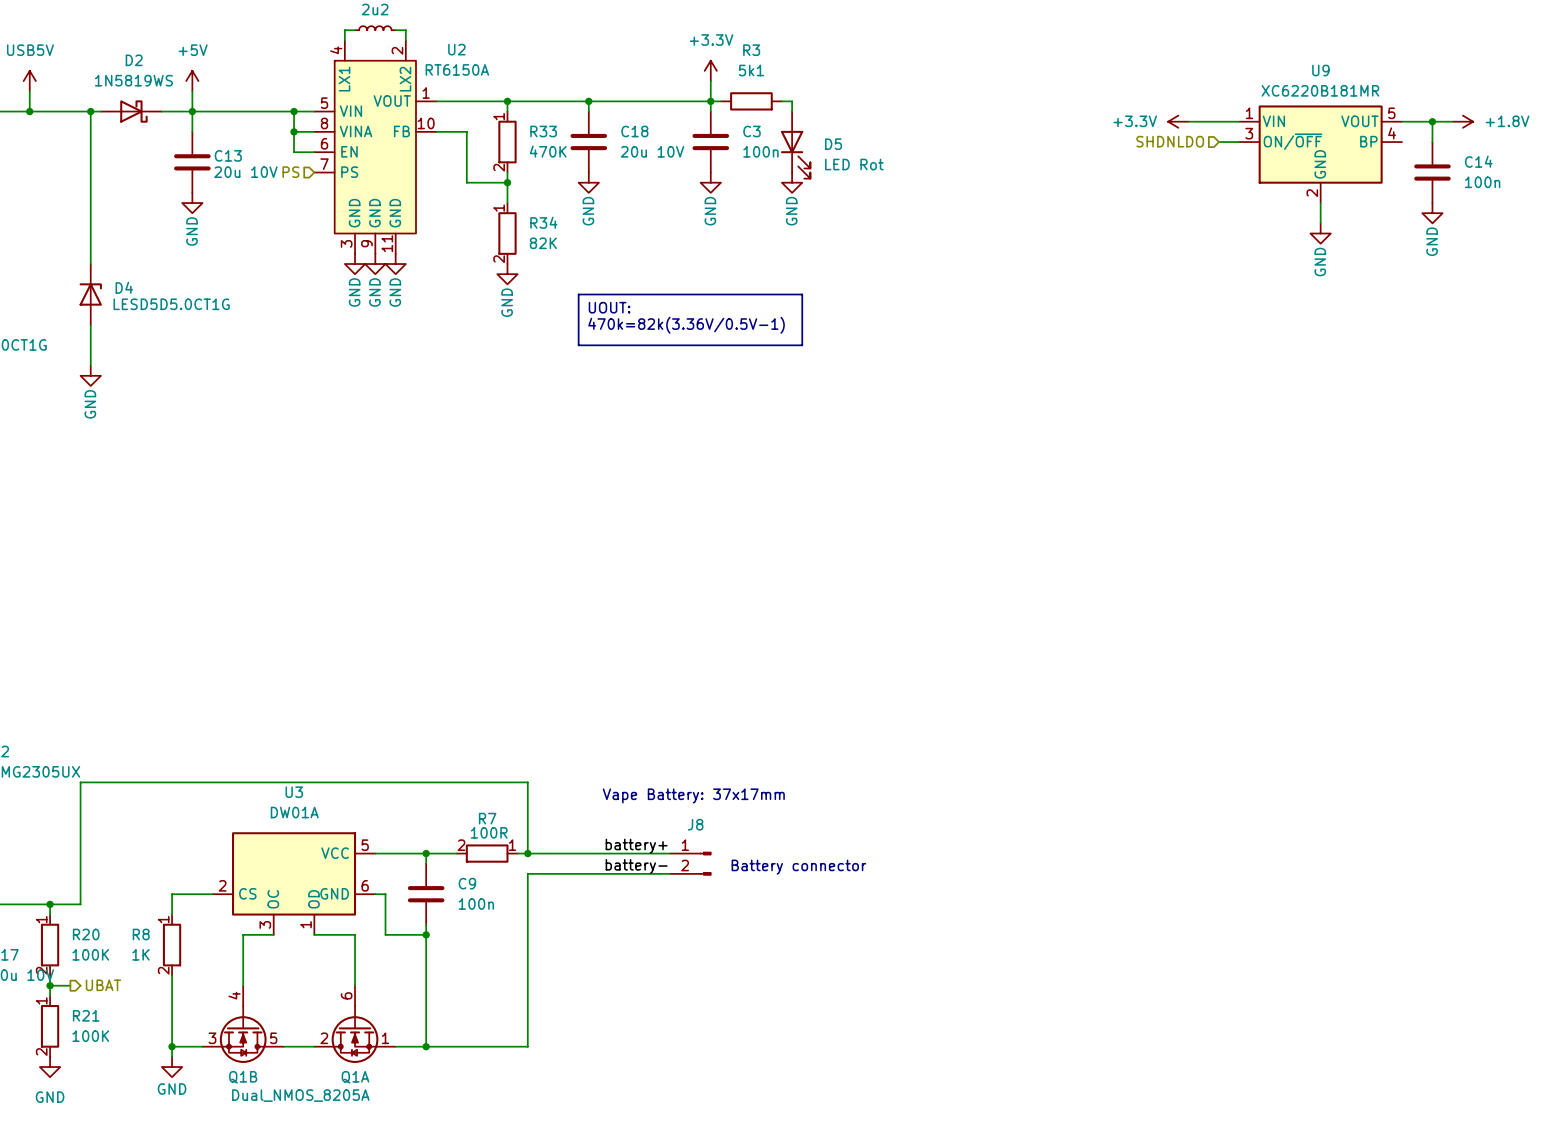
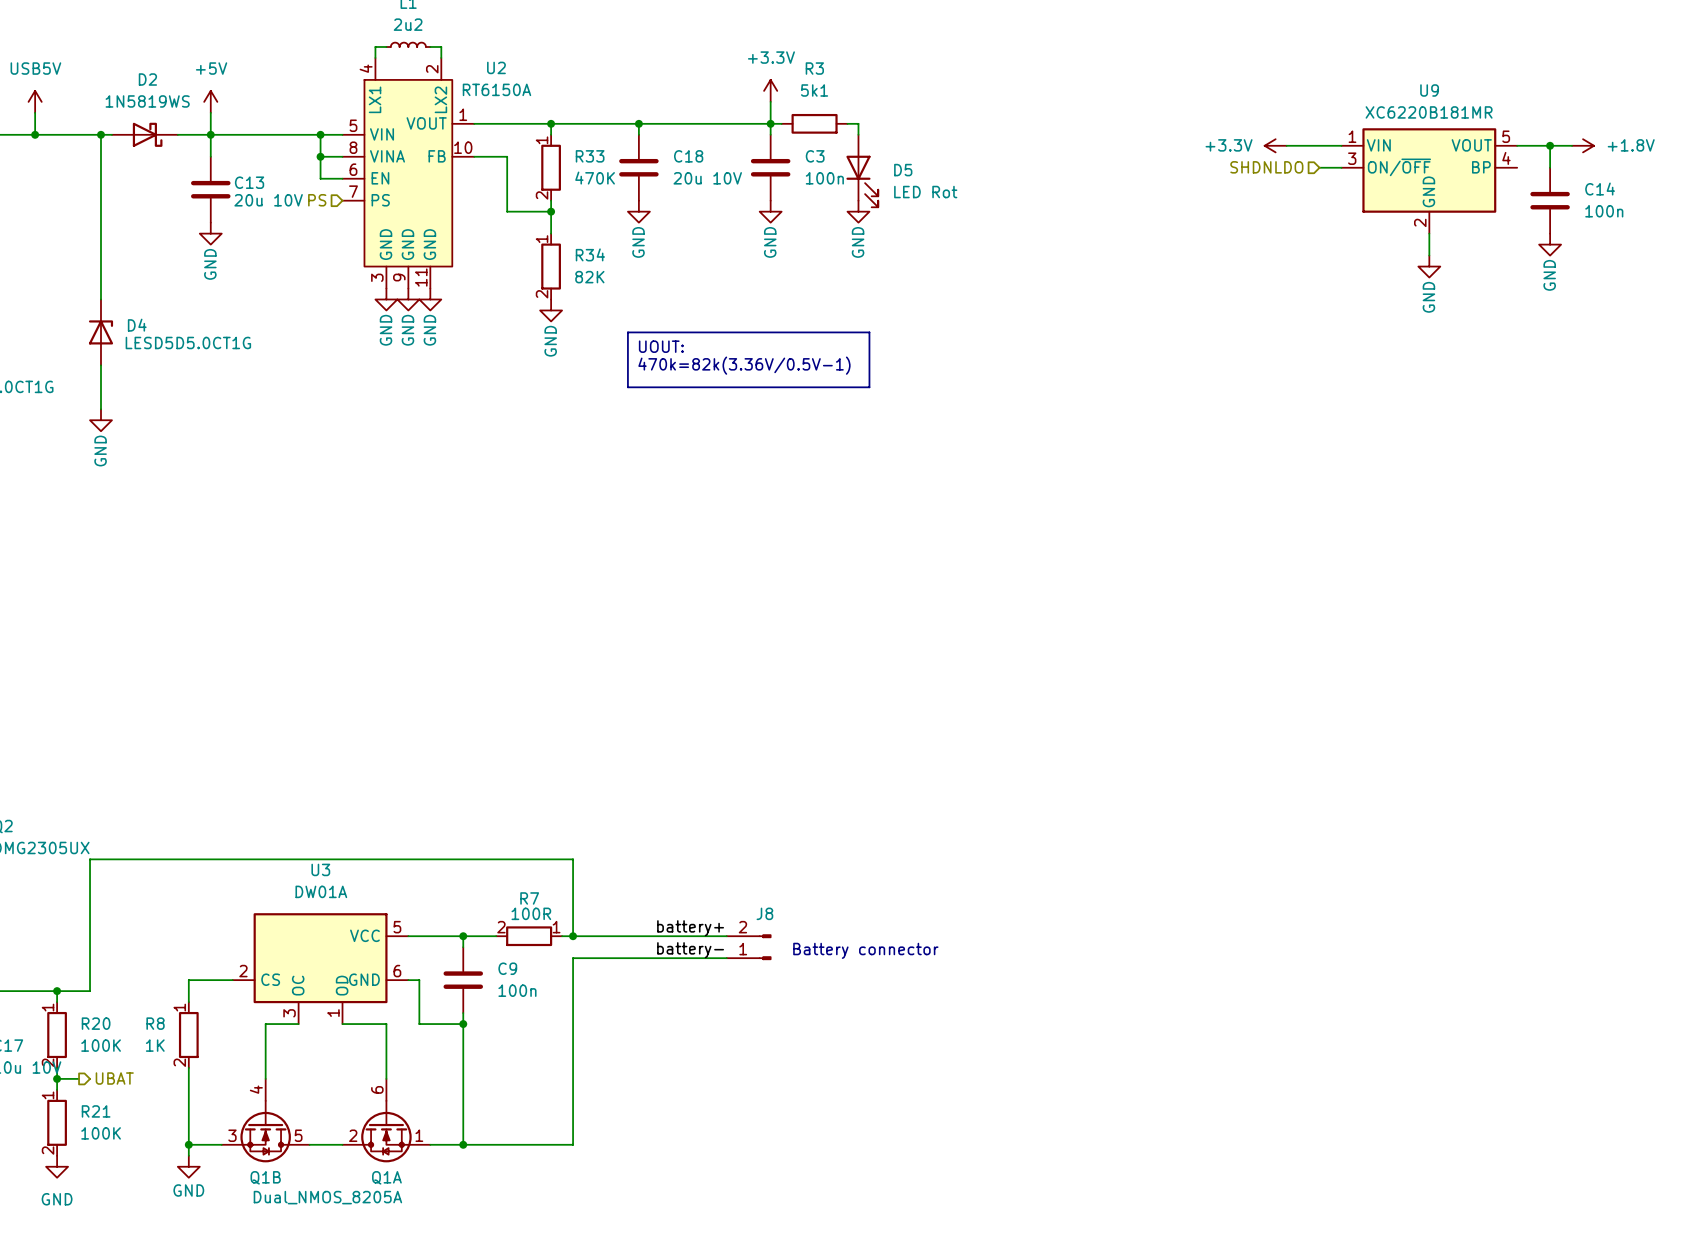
text: Vape Battery: 37x17mm (693, 795) -> none
J8 flip: as is (705, 863) -> up-down (765, 947)

